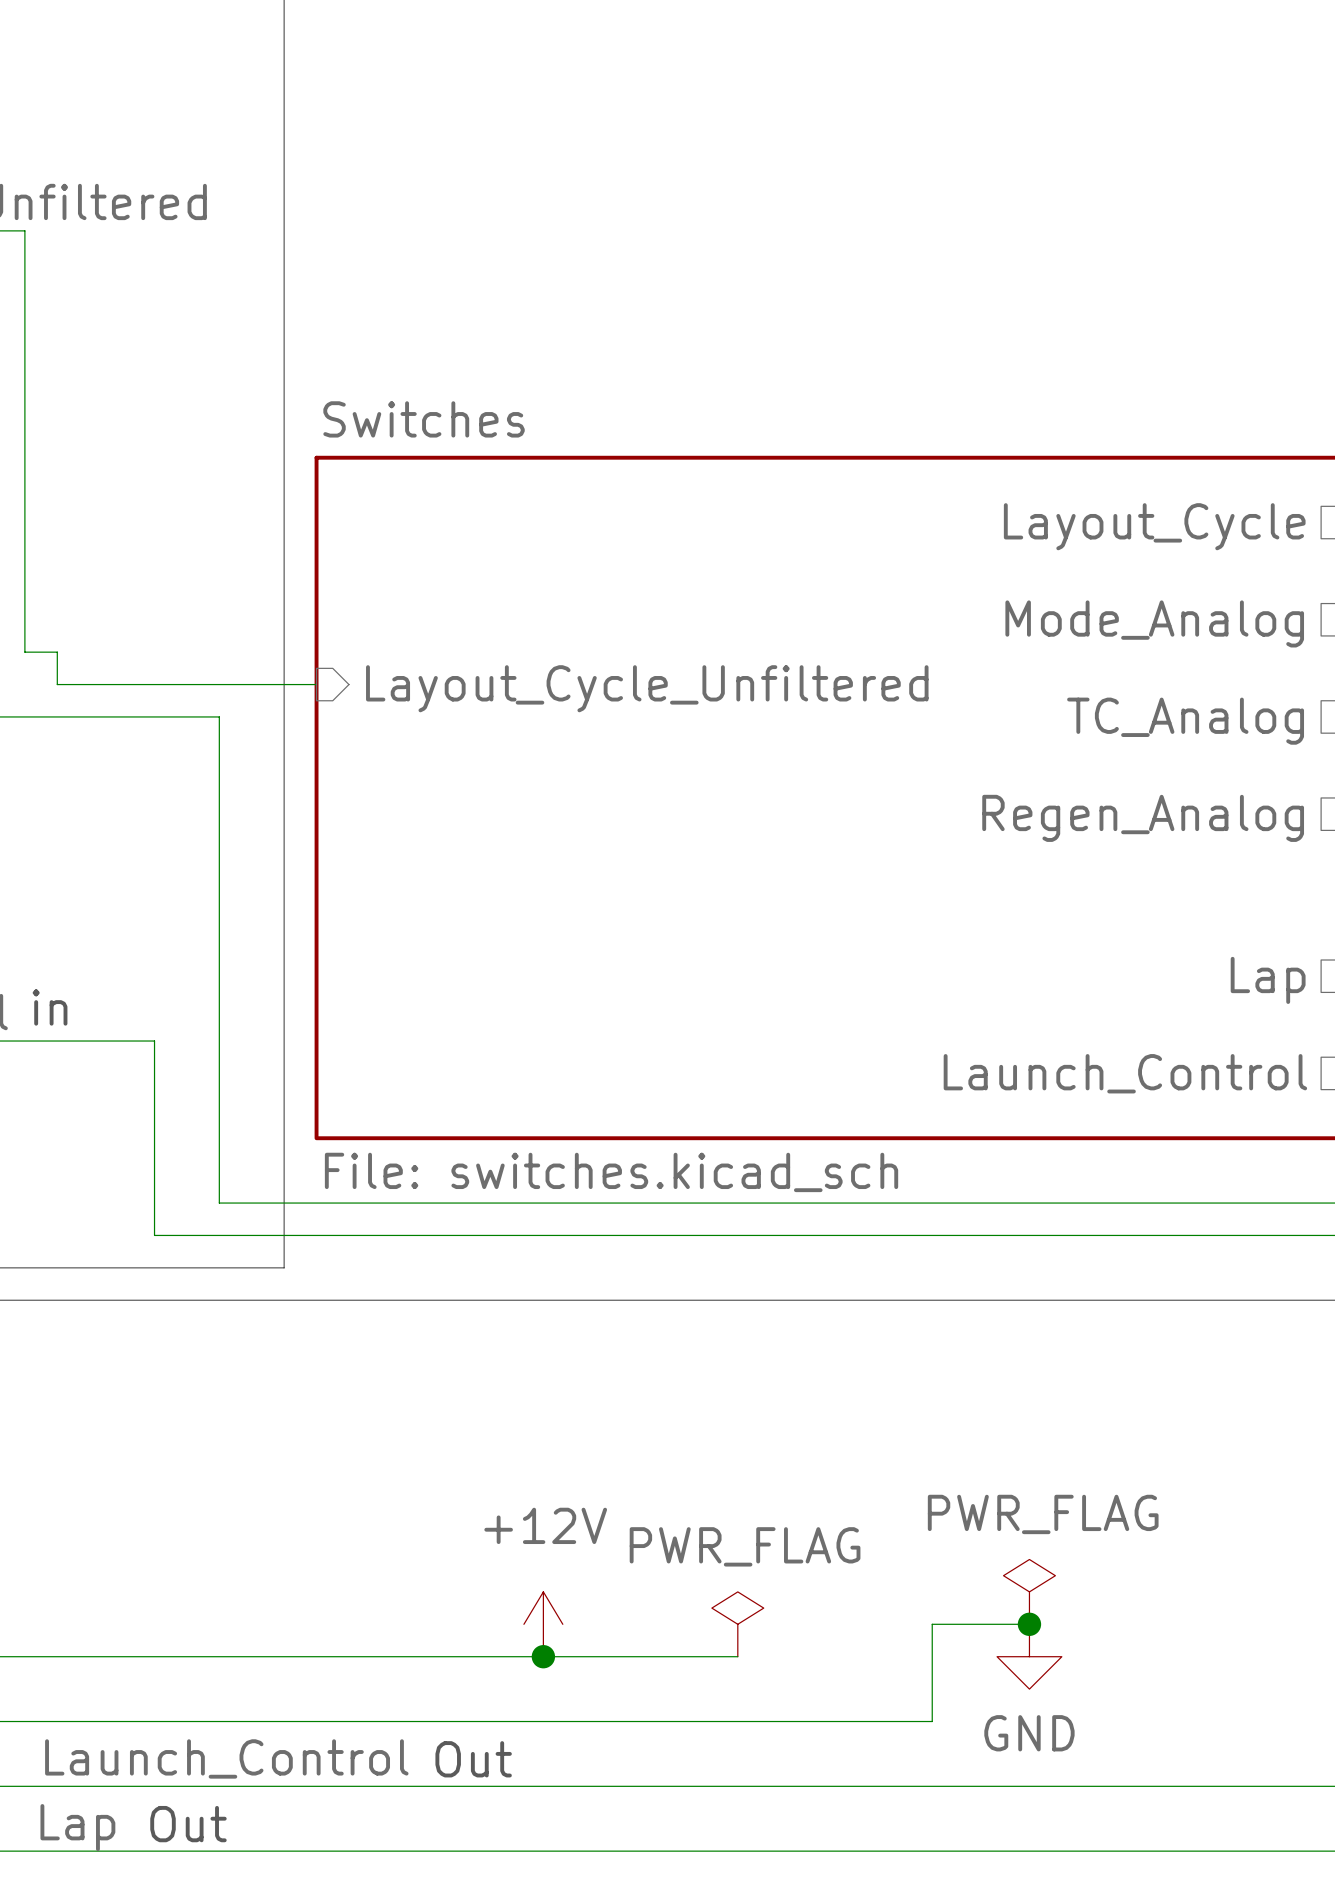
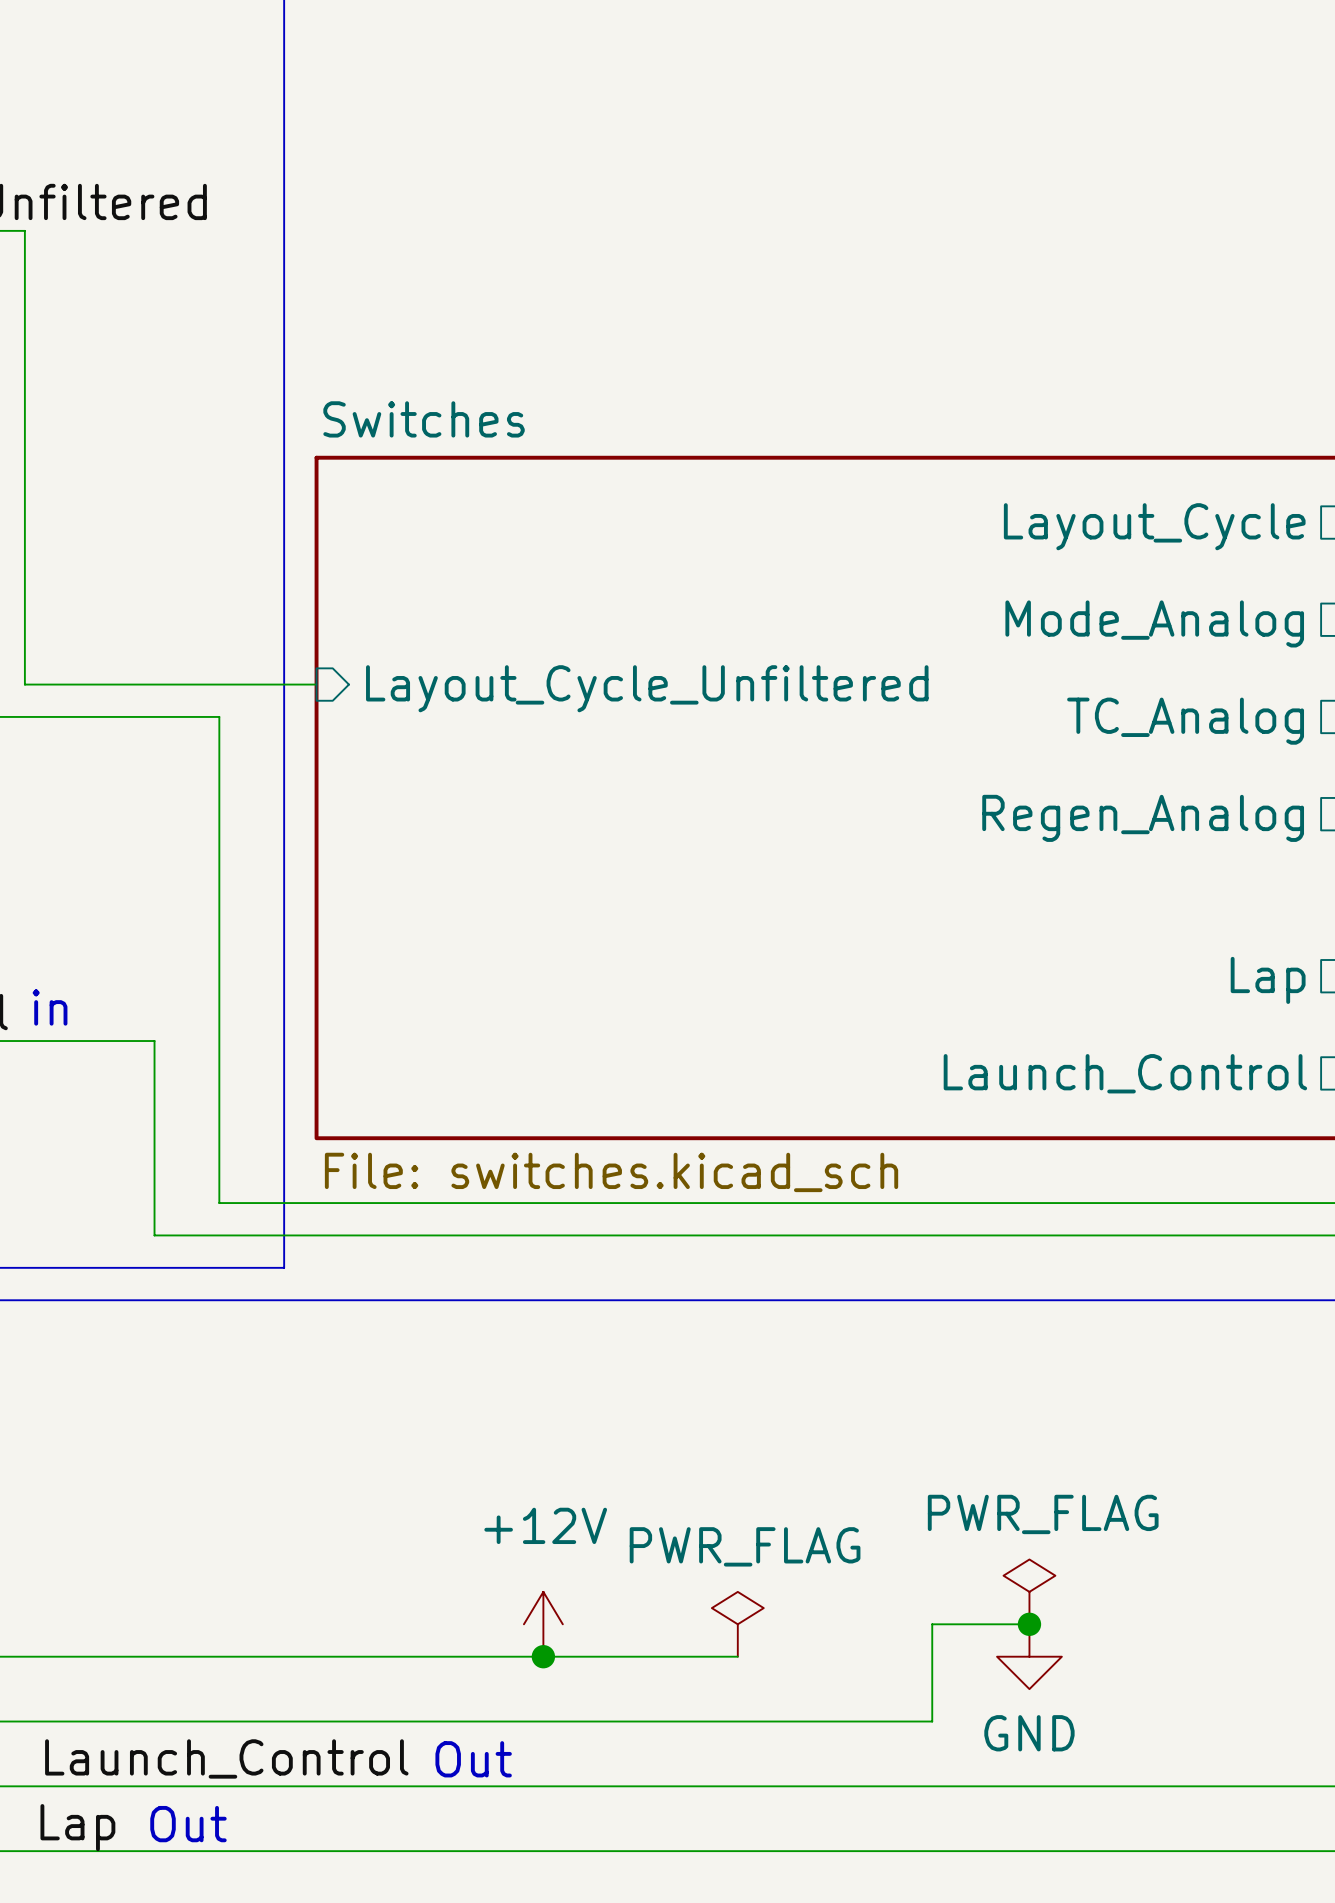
wire: (24, 652) (57, 652) (57, 684) -> (24, 652) (24, 684) (57, 684)

